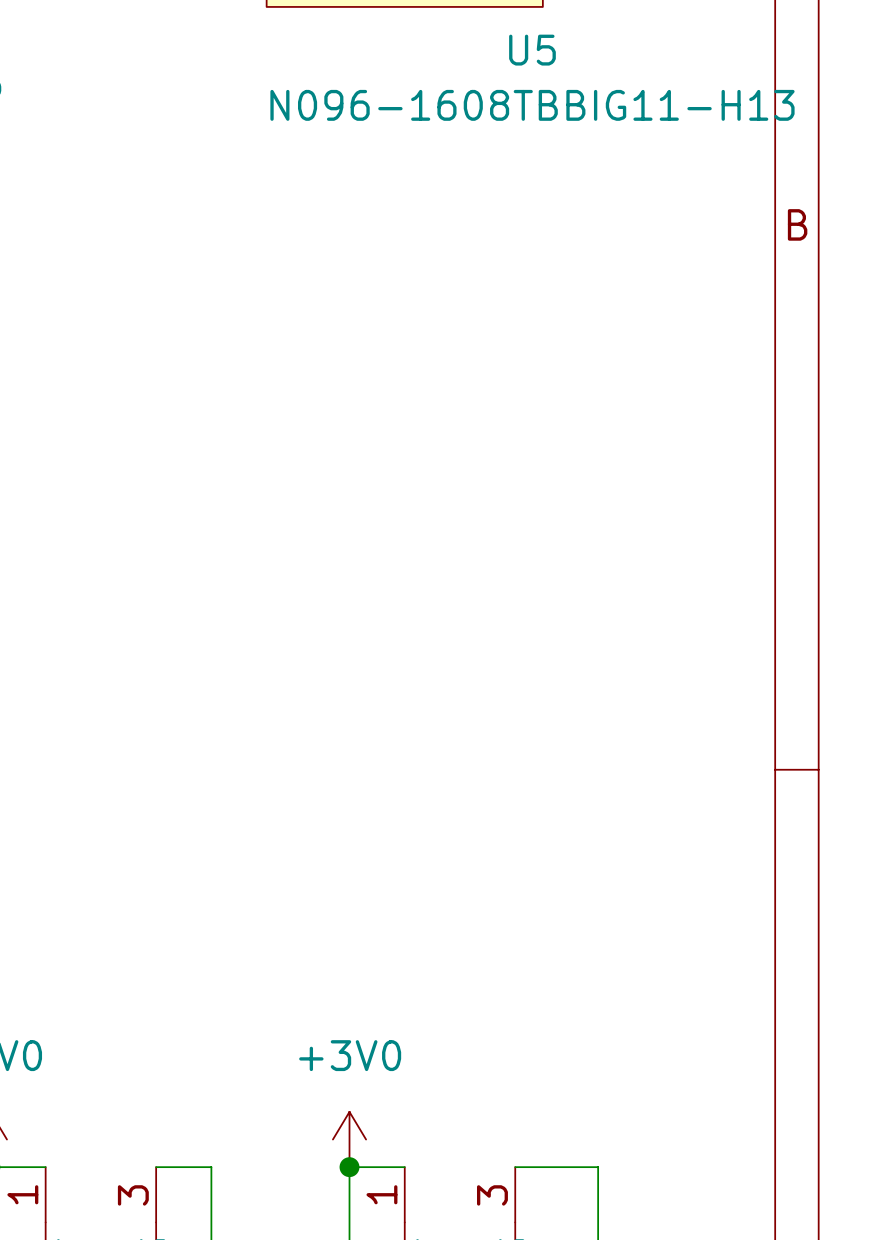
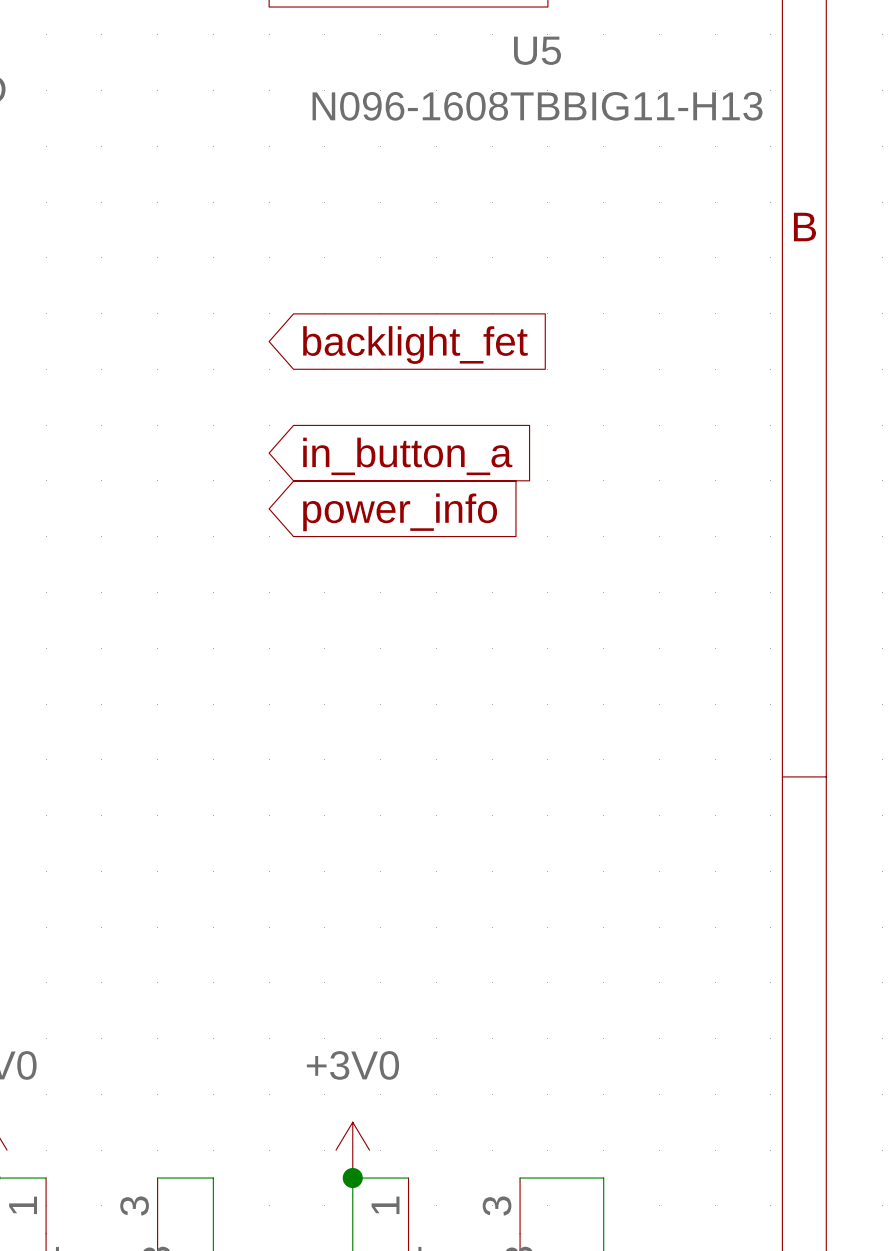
global label: none -> backlight_fet (415, 345)
global label: none -> in_button_a (407, 456)
global label: none -> power_info (400, 512)

